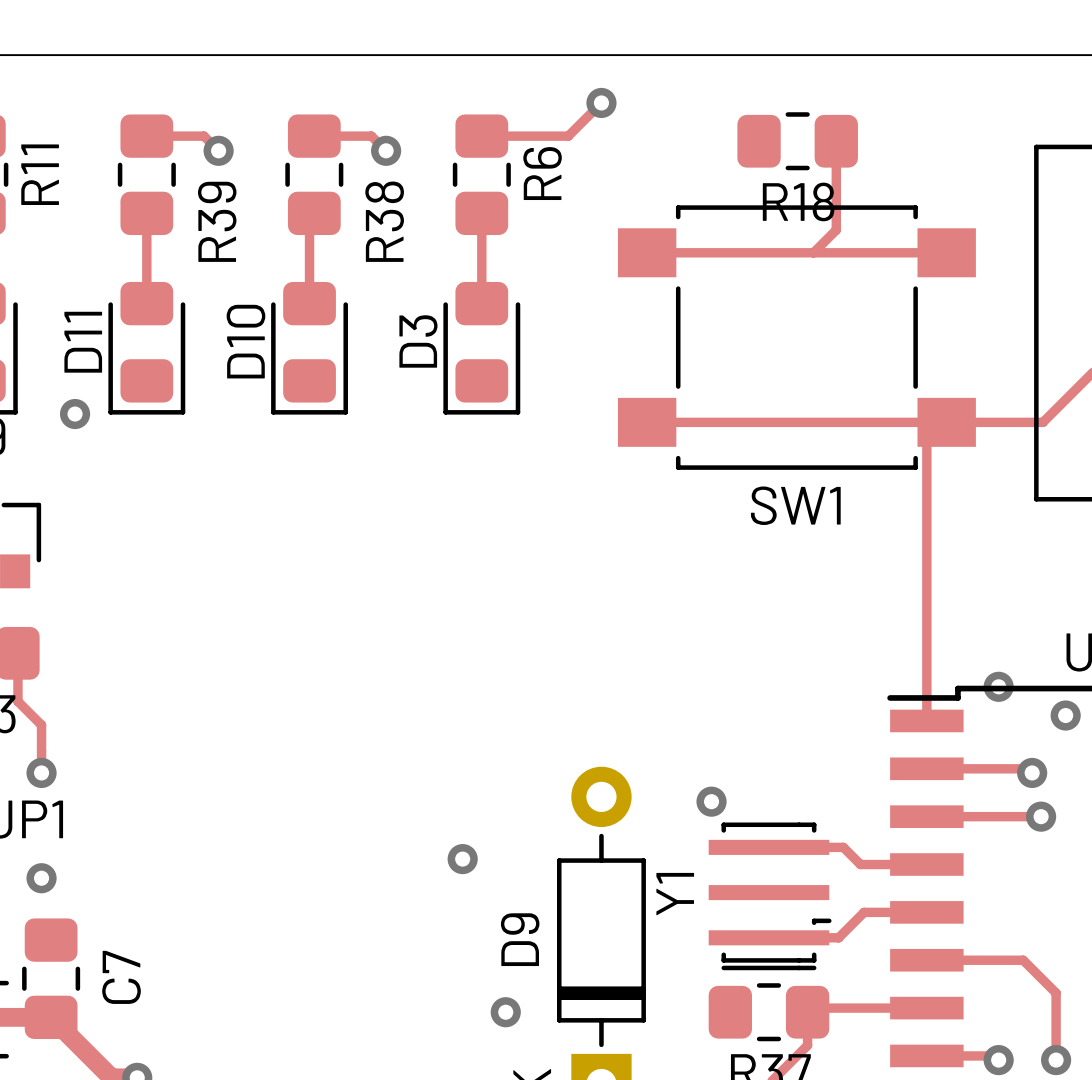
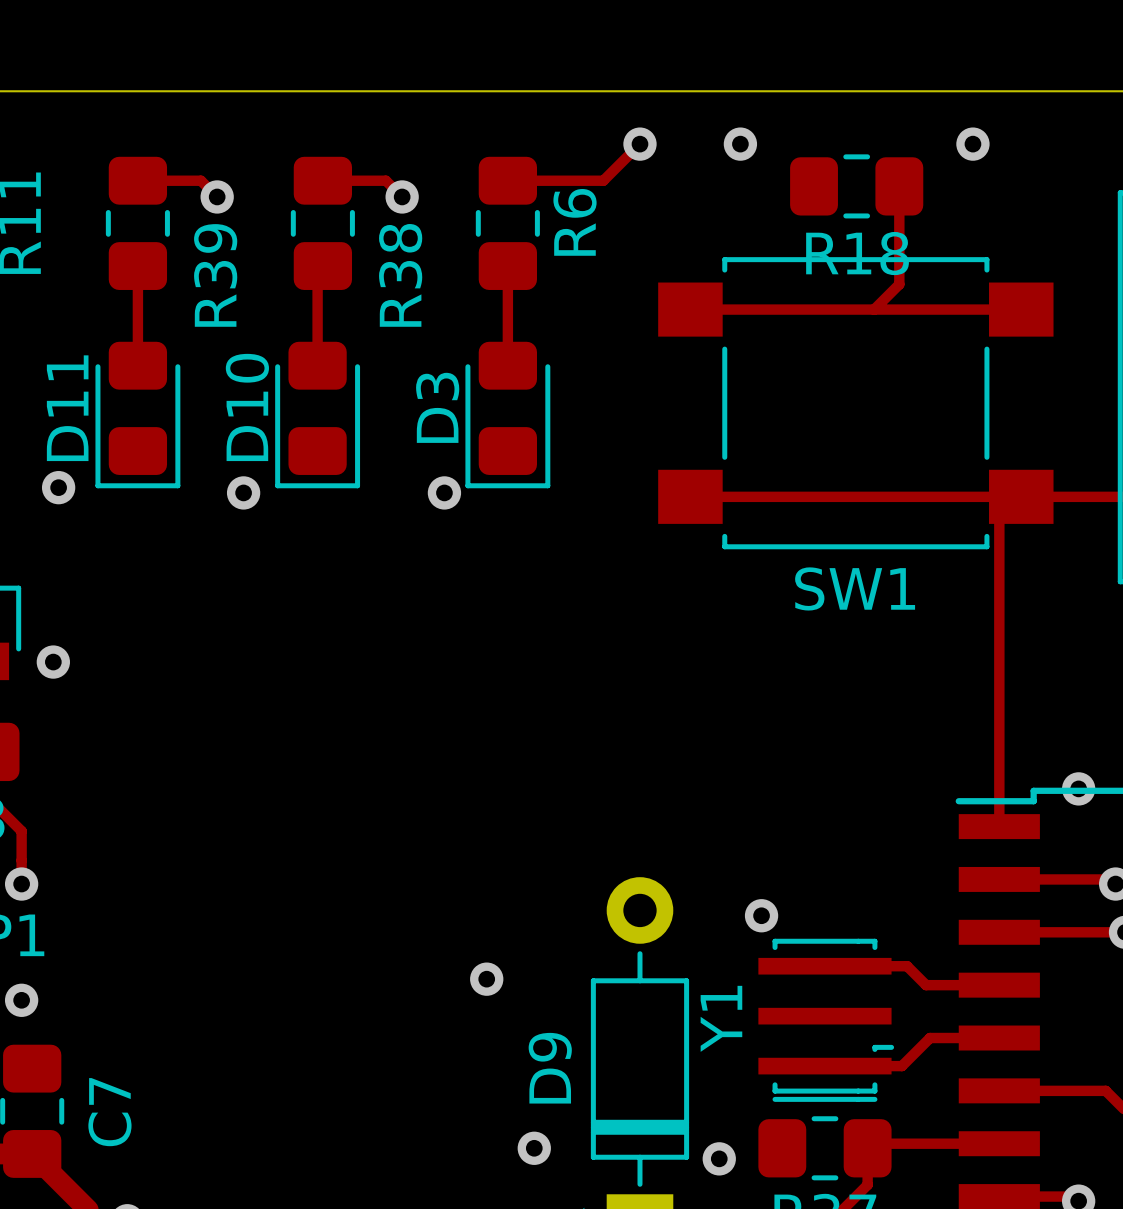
via: none -> (740, 144)
via: none -> (972, 144)
via: none -> (243, 492)
via: none -> (444, 492)
via: none -> (53, 662)
via: none -> (719, 1158)

